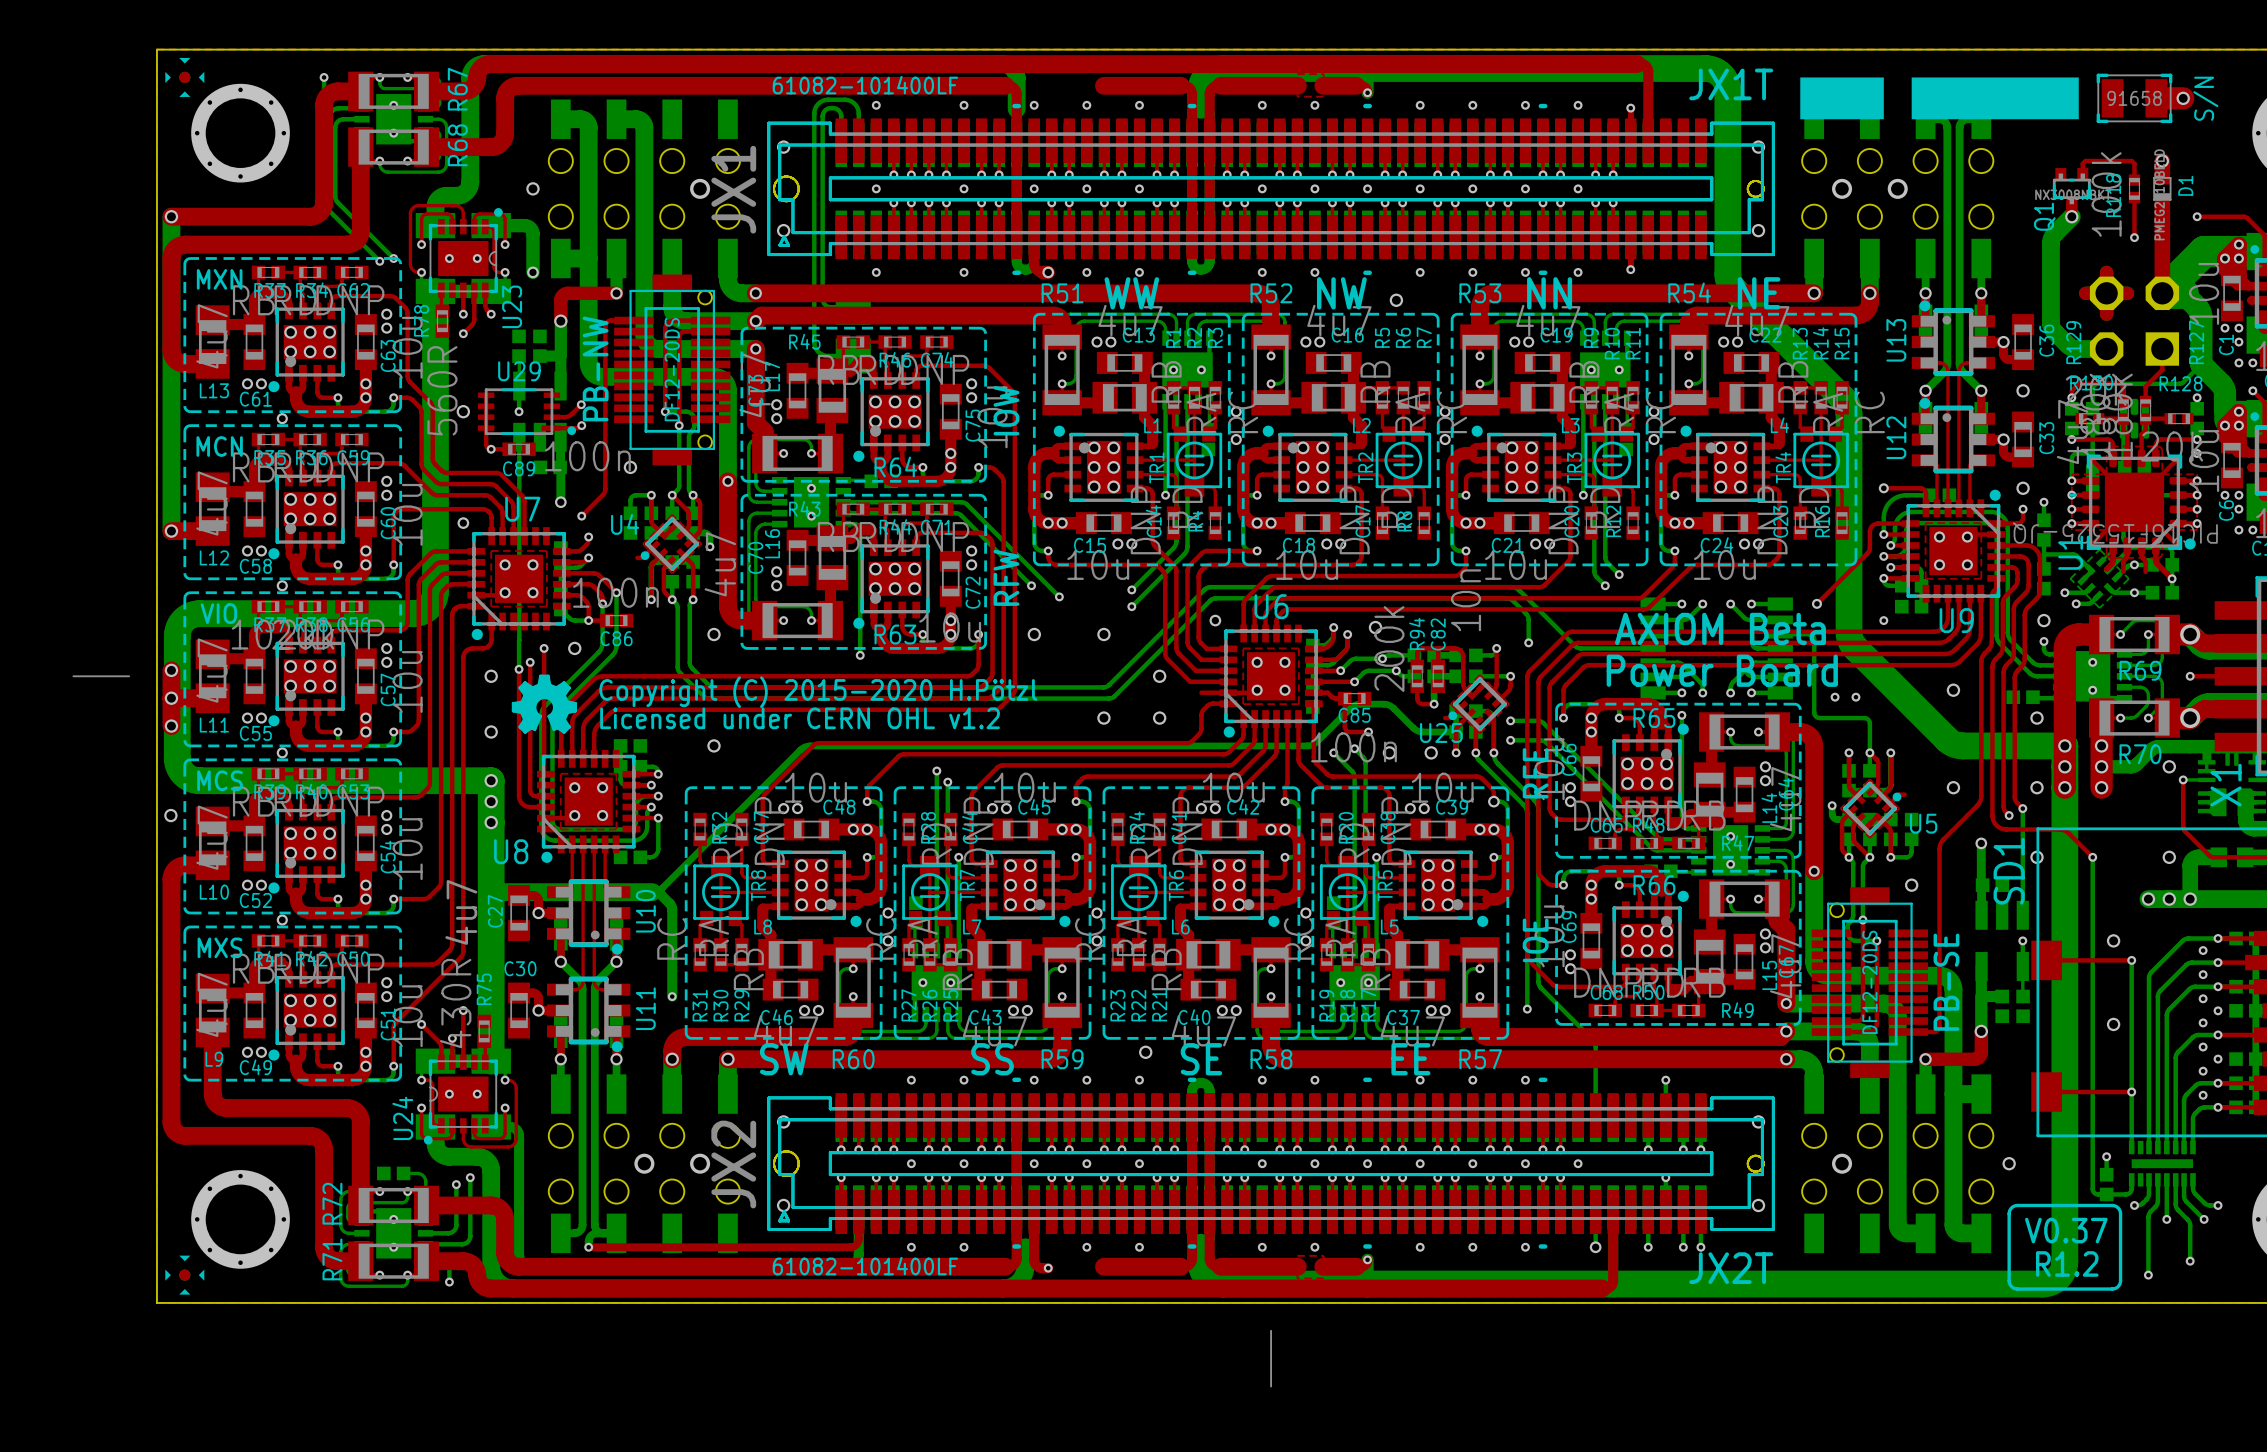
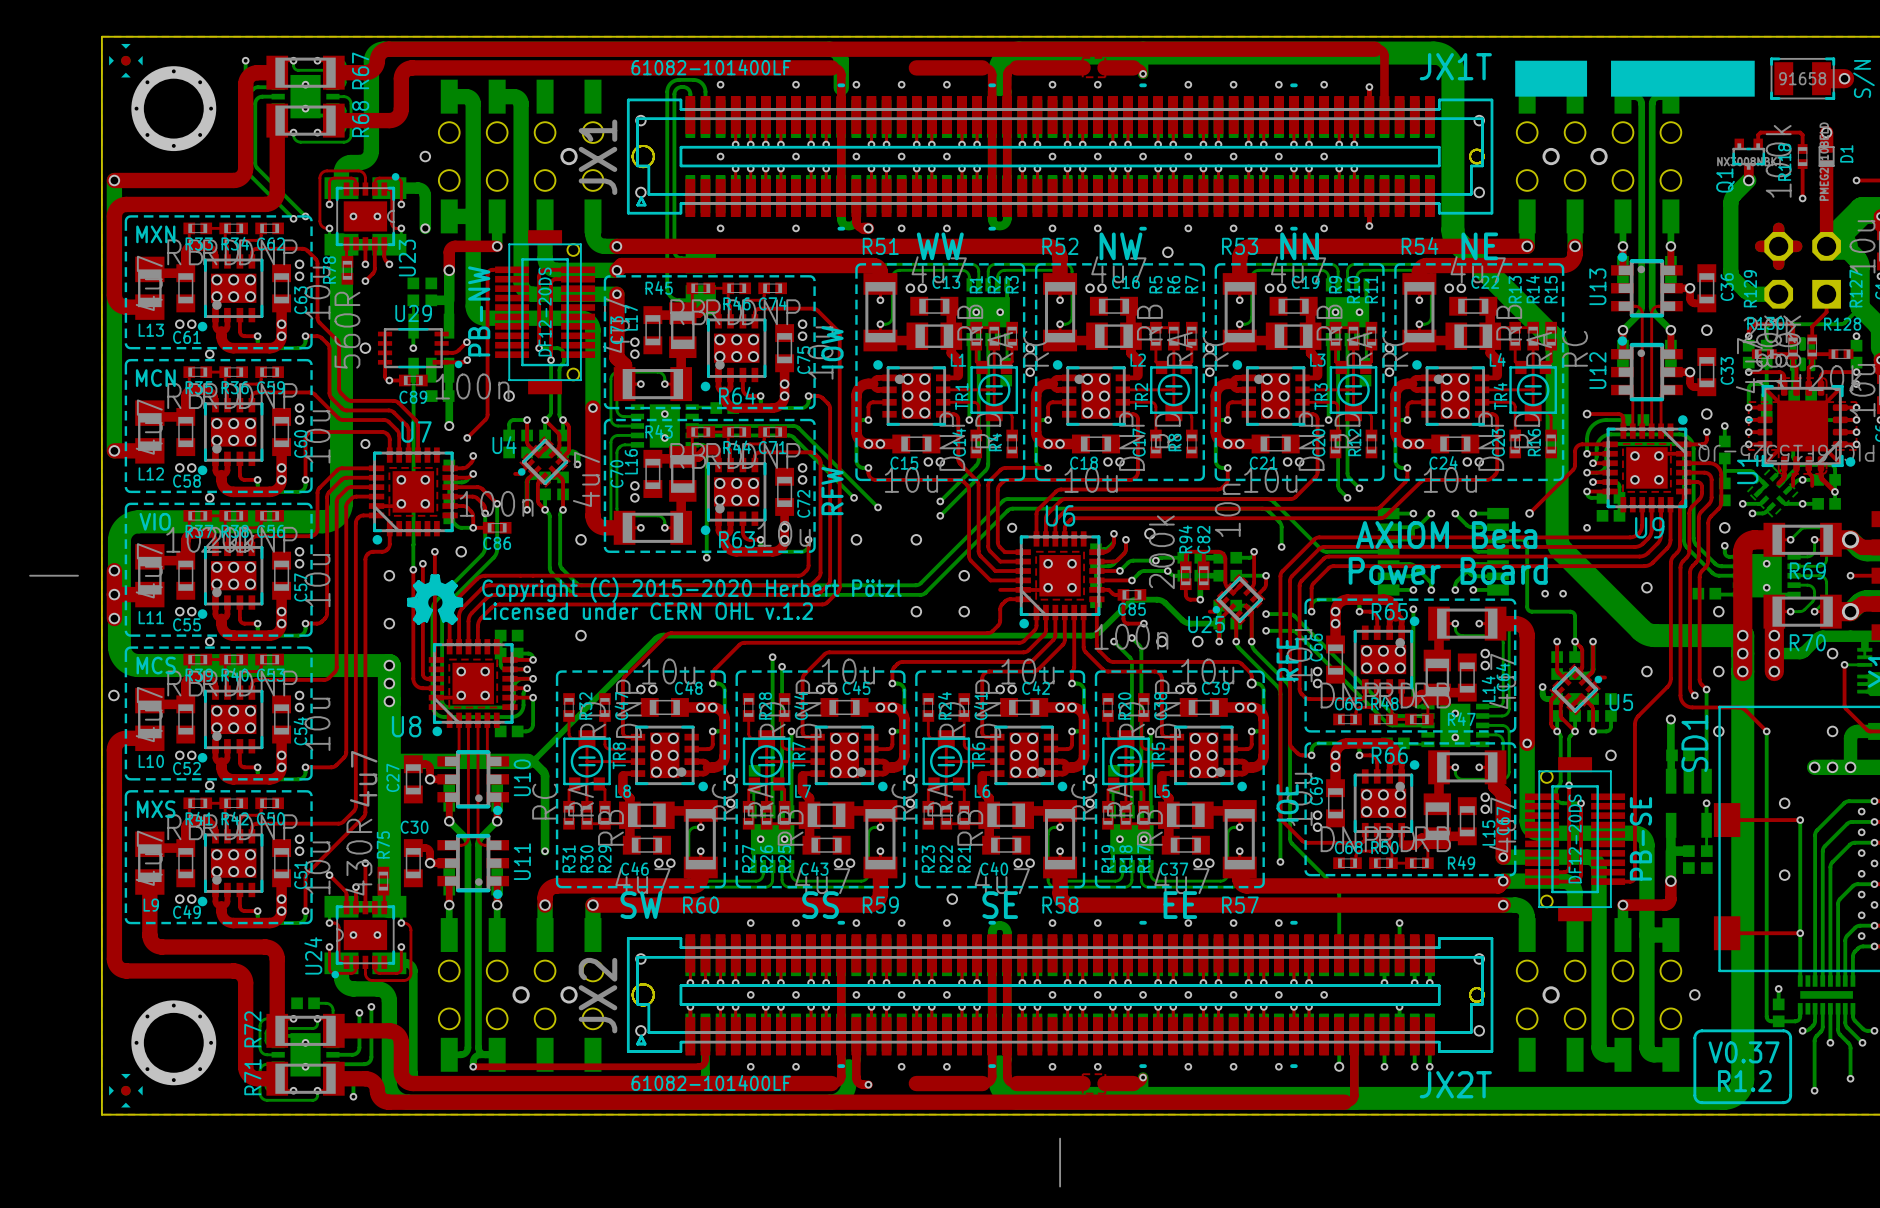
text: Copyright (C) 2015-2020 H.Pötzl (818, 692) -> Copyright (C) 2015-2020 Herbert Pötzl (691, 590)
text: Licensed under CERN OHL v1.2 (800, 718) -> Licensed under CERN OHL v.1.2 (647, 611)

